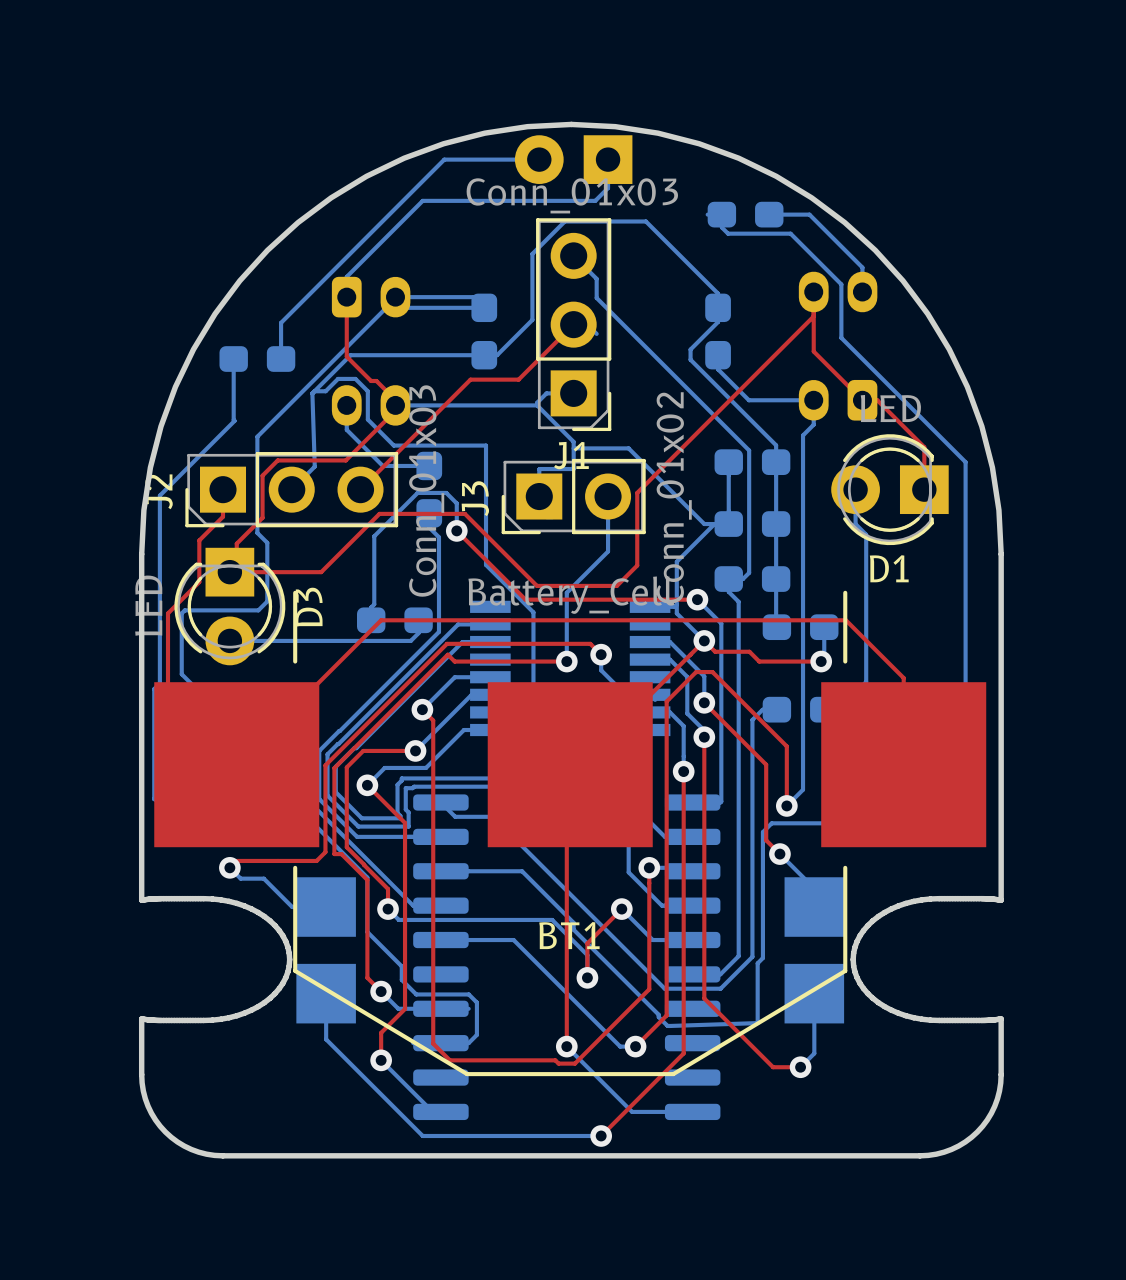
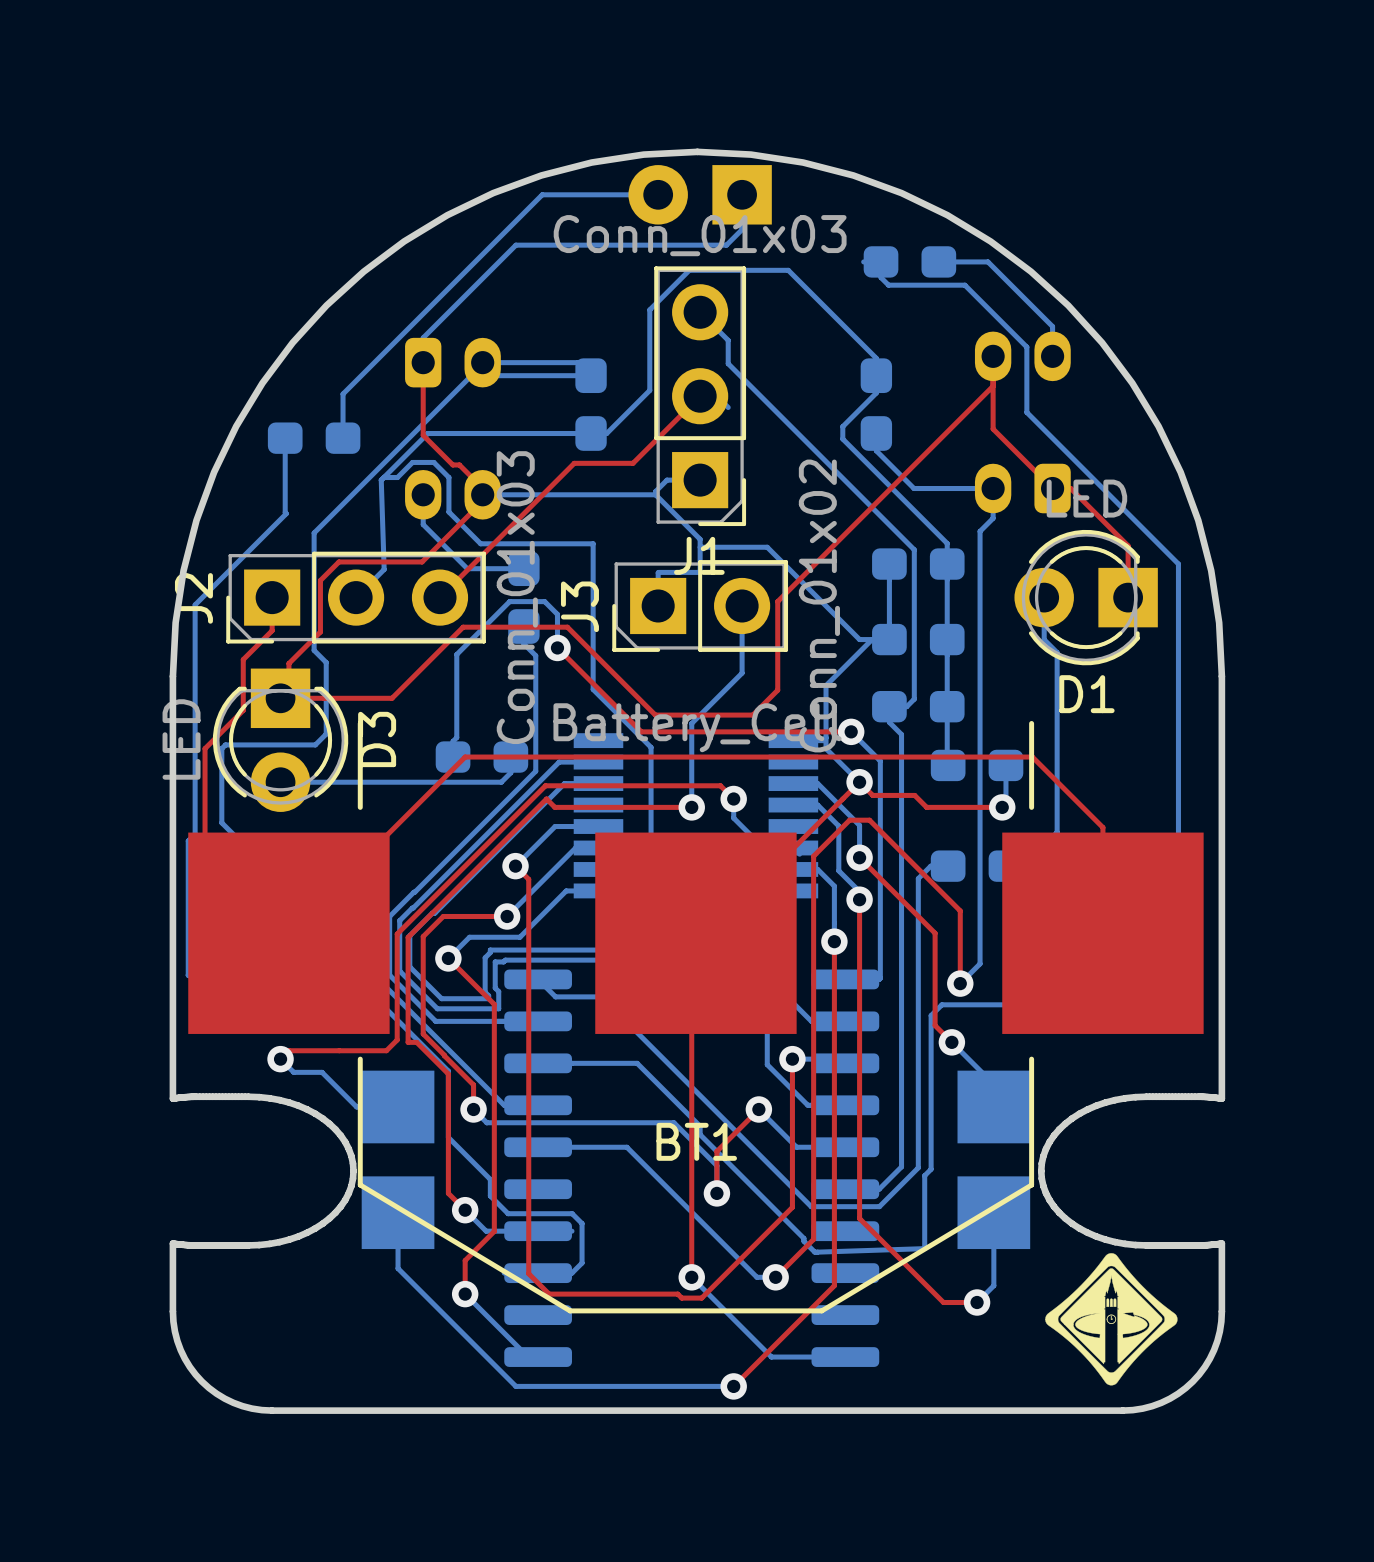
drawing: none -> [1045, 1253, 1178, 1386]

